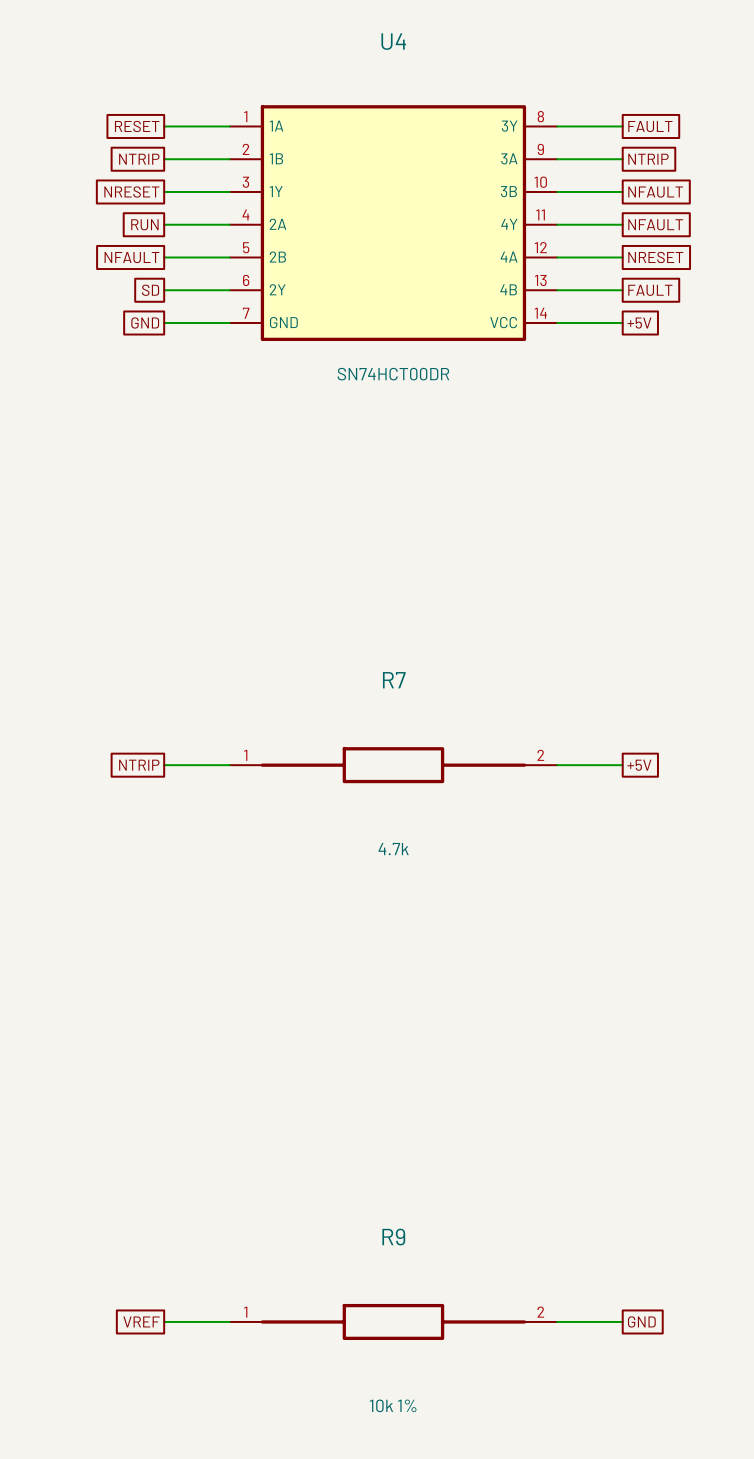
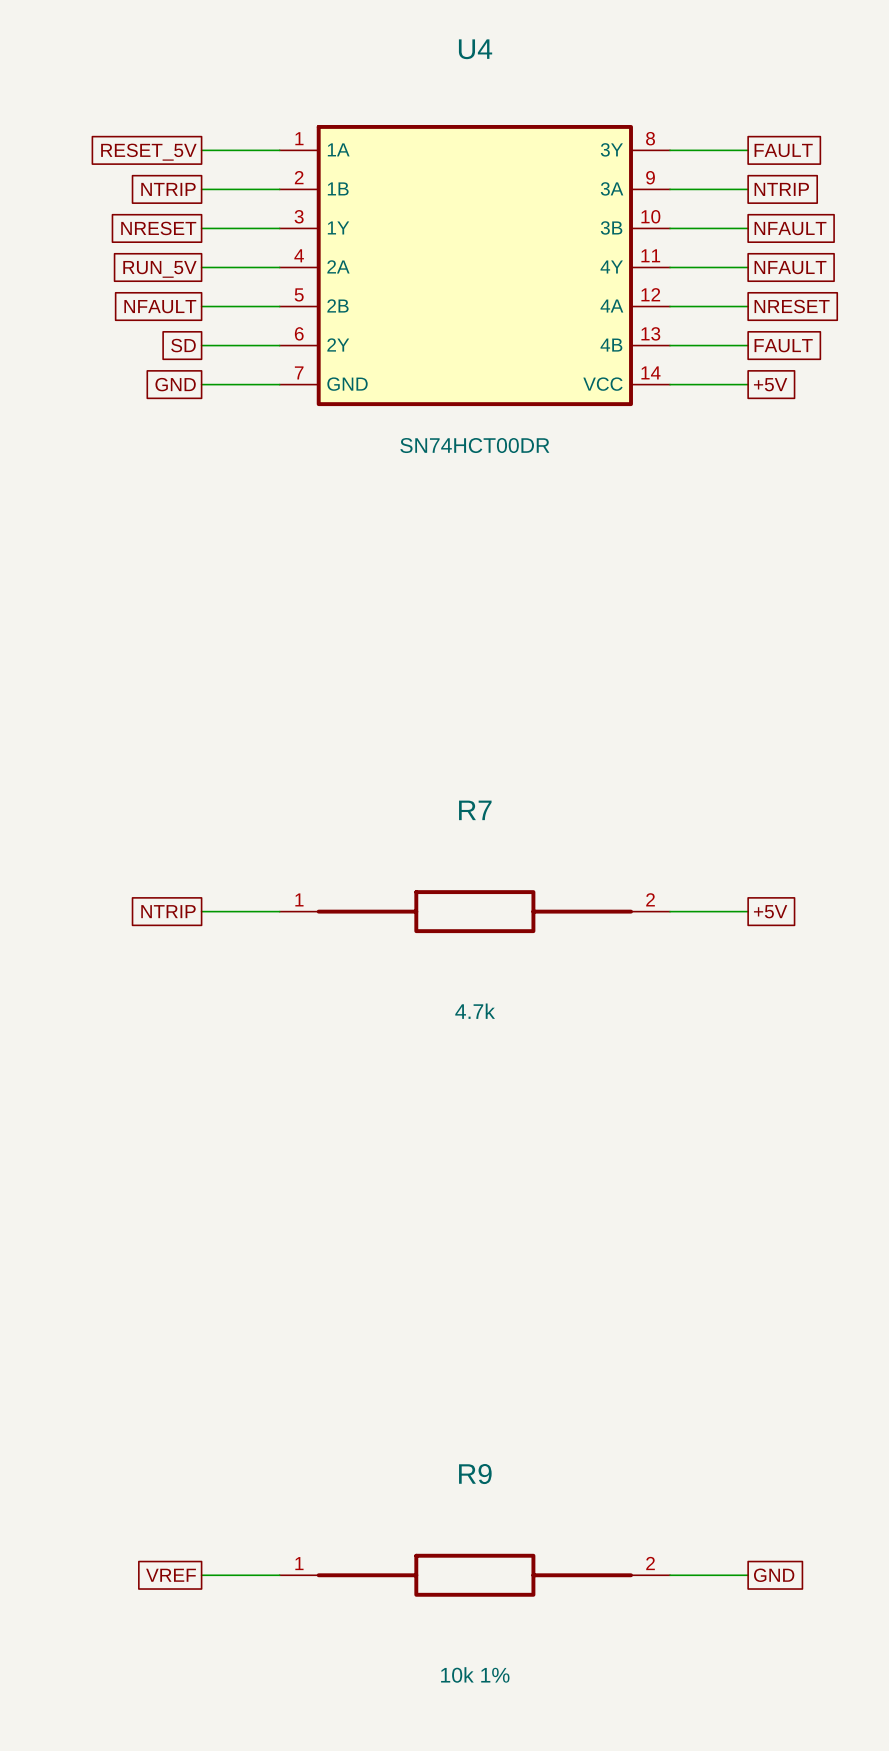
global label: RESET (137, 126) -> RESET_5V (148, 152)
global label: RUN (144, 224) -> RUN_5V (159, 269)

